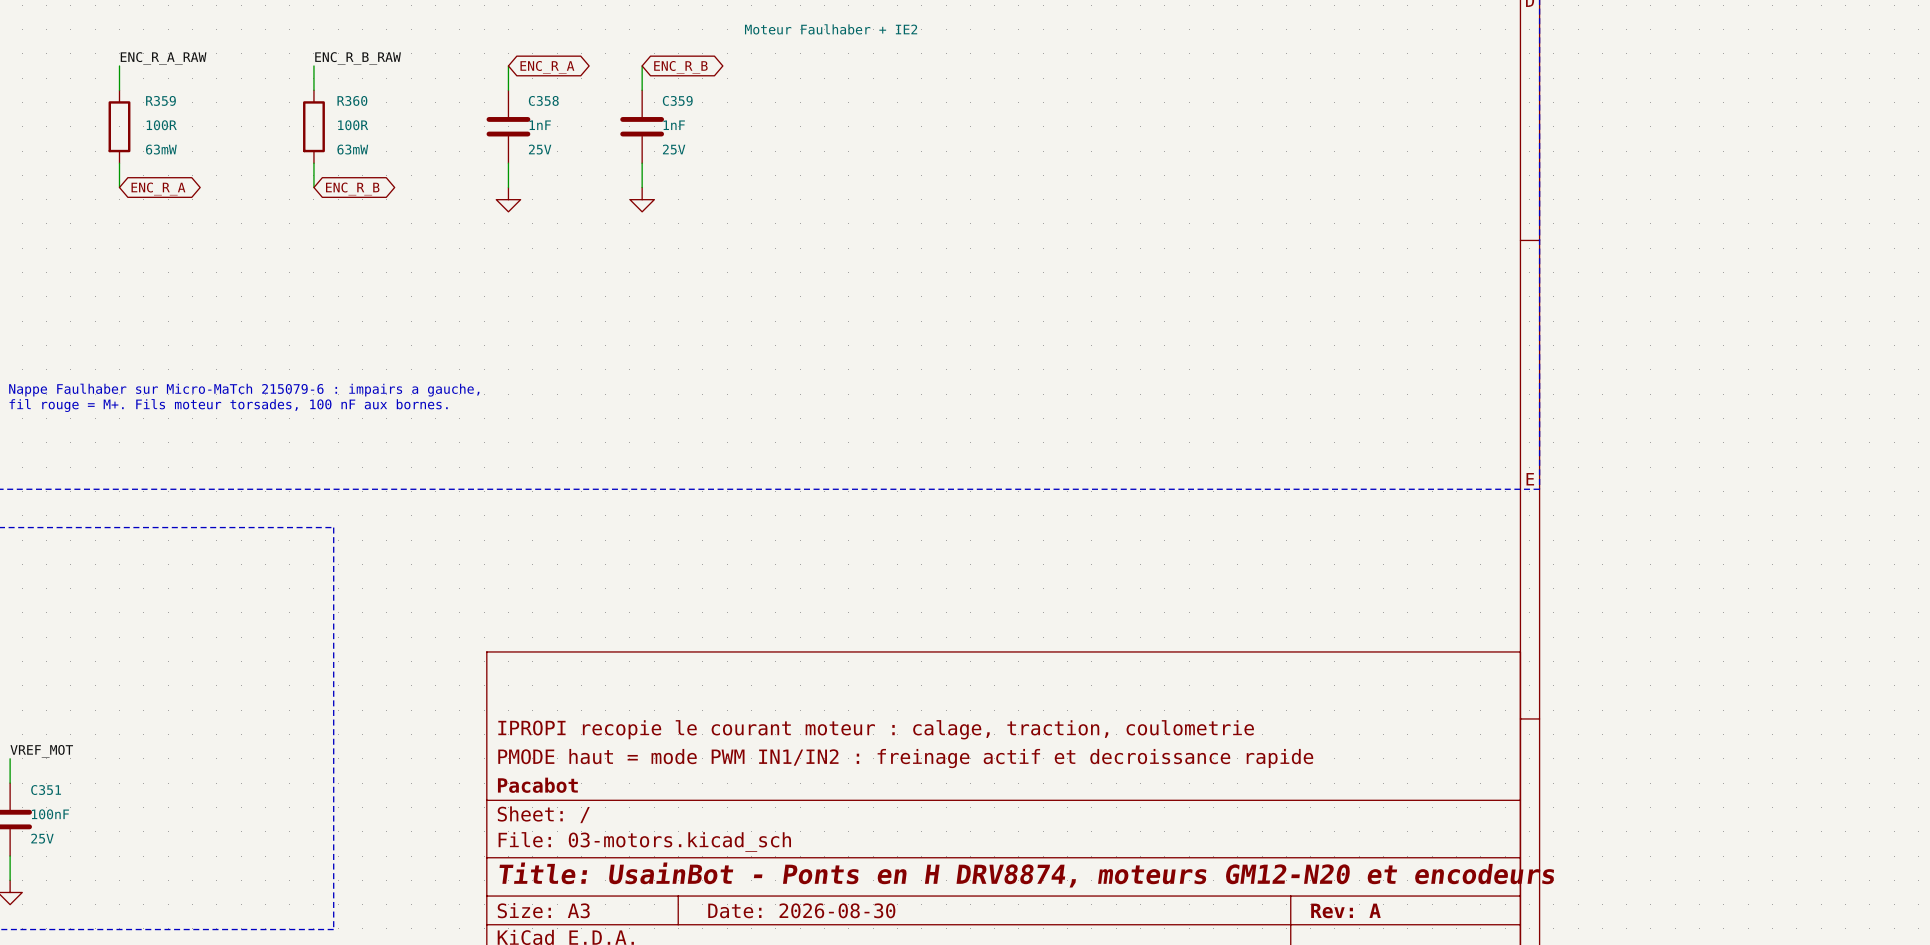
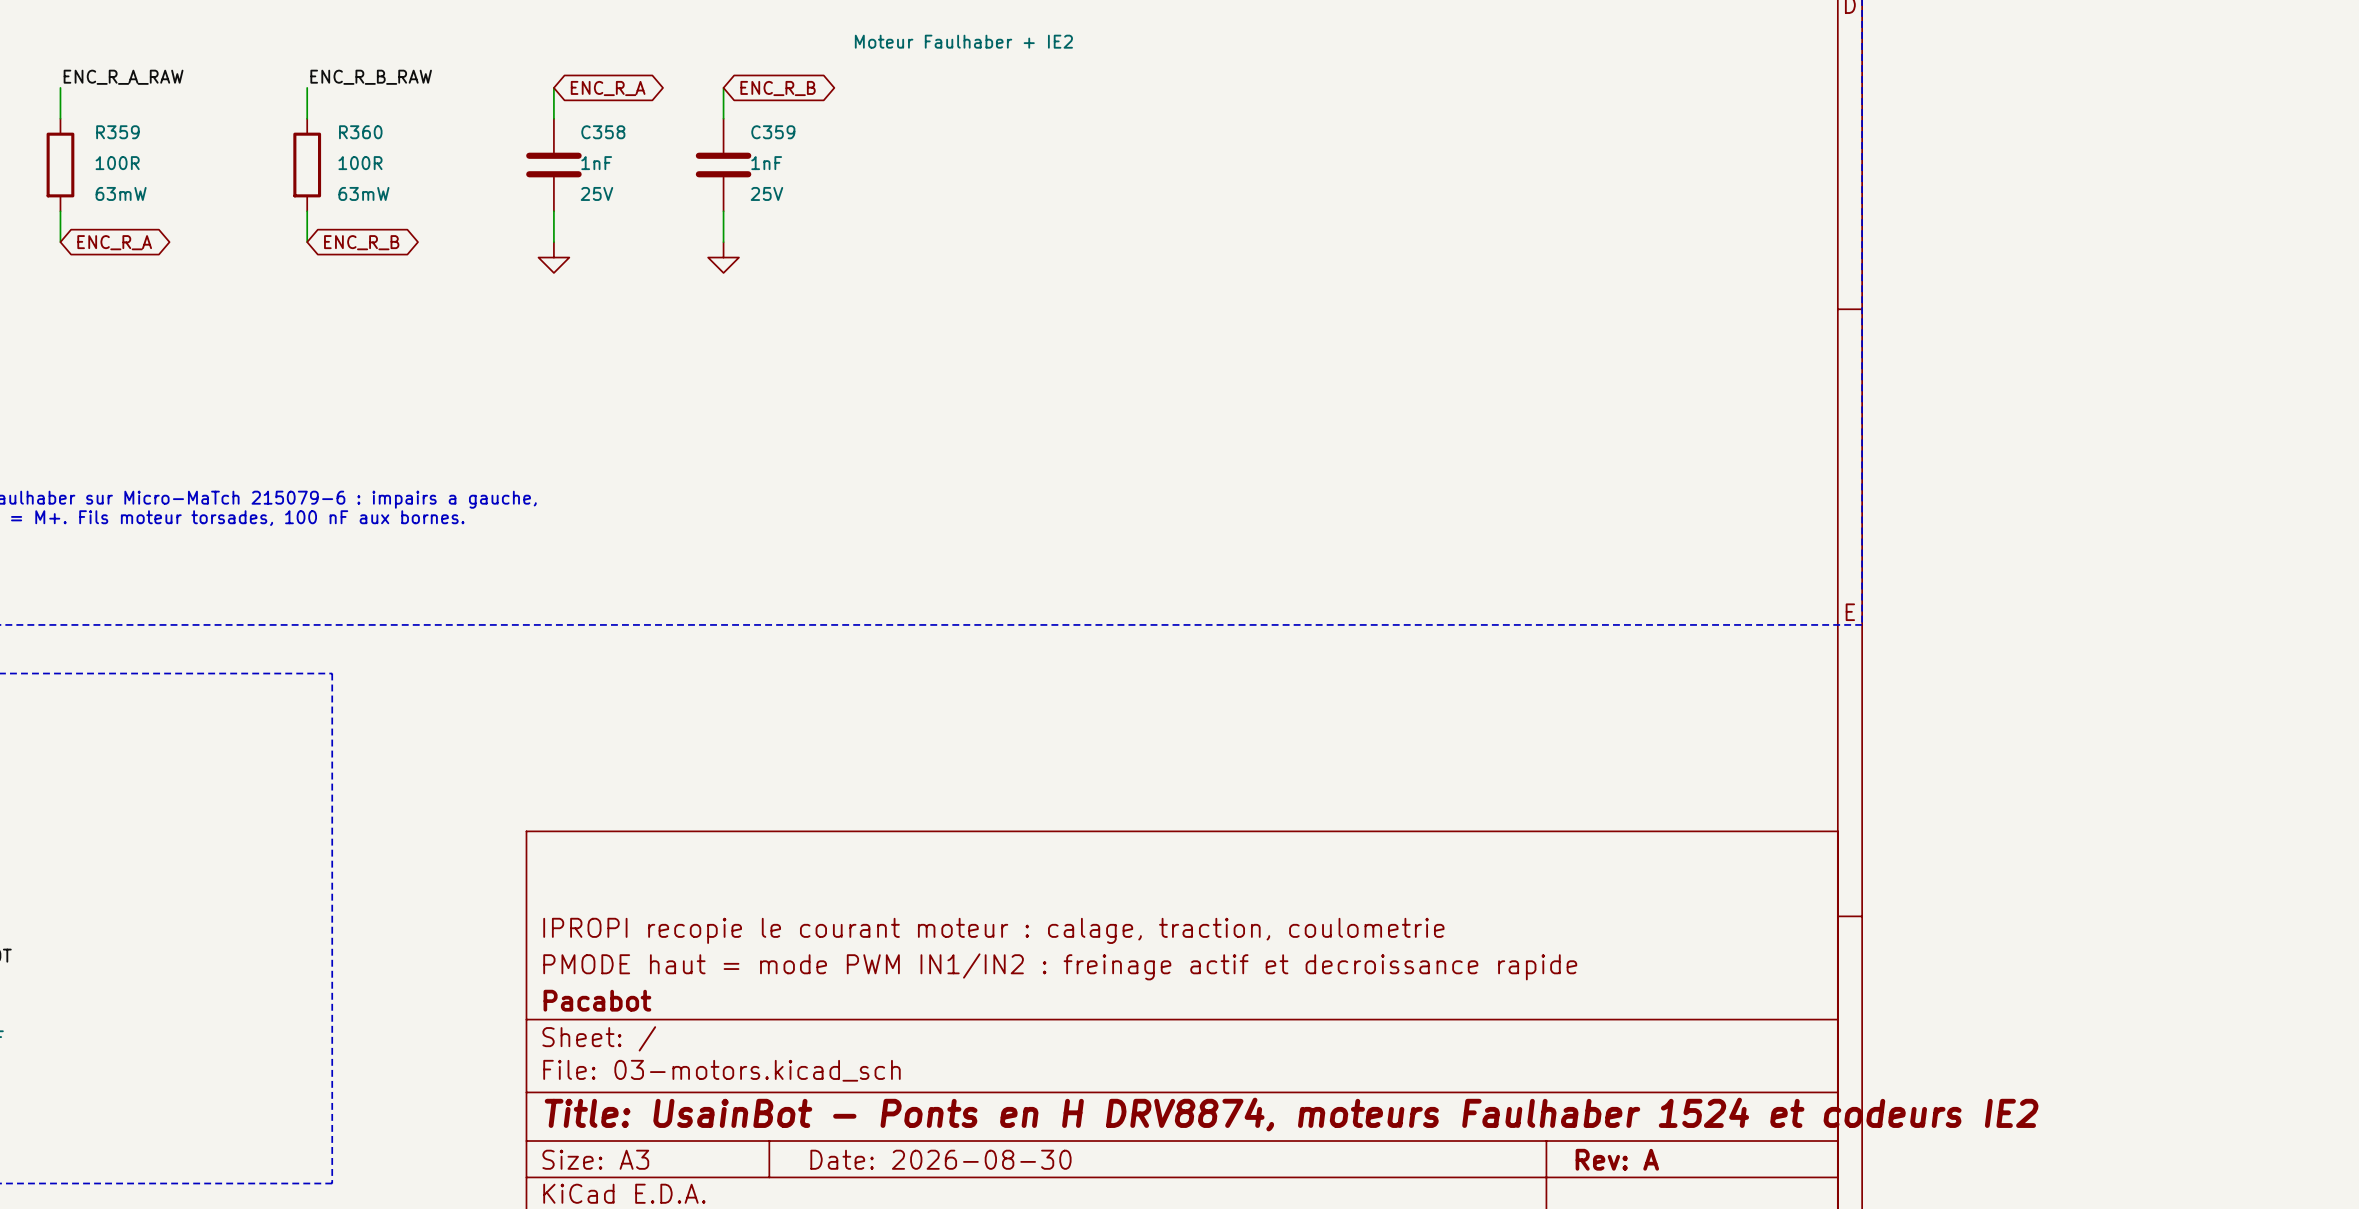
title block: Title: UsainBot - Ponts en H DRV8874, moteurs GM12-N20 et encodeurs (1026, 875) -> Title: UsainBot - Ponts en H DRV8874, moteurs Faulhaber 1524 et codeurs IE2 (1291, 1114)

